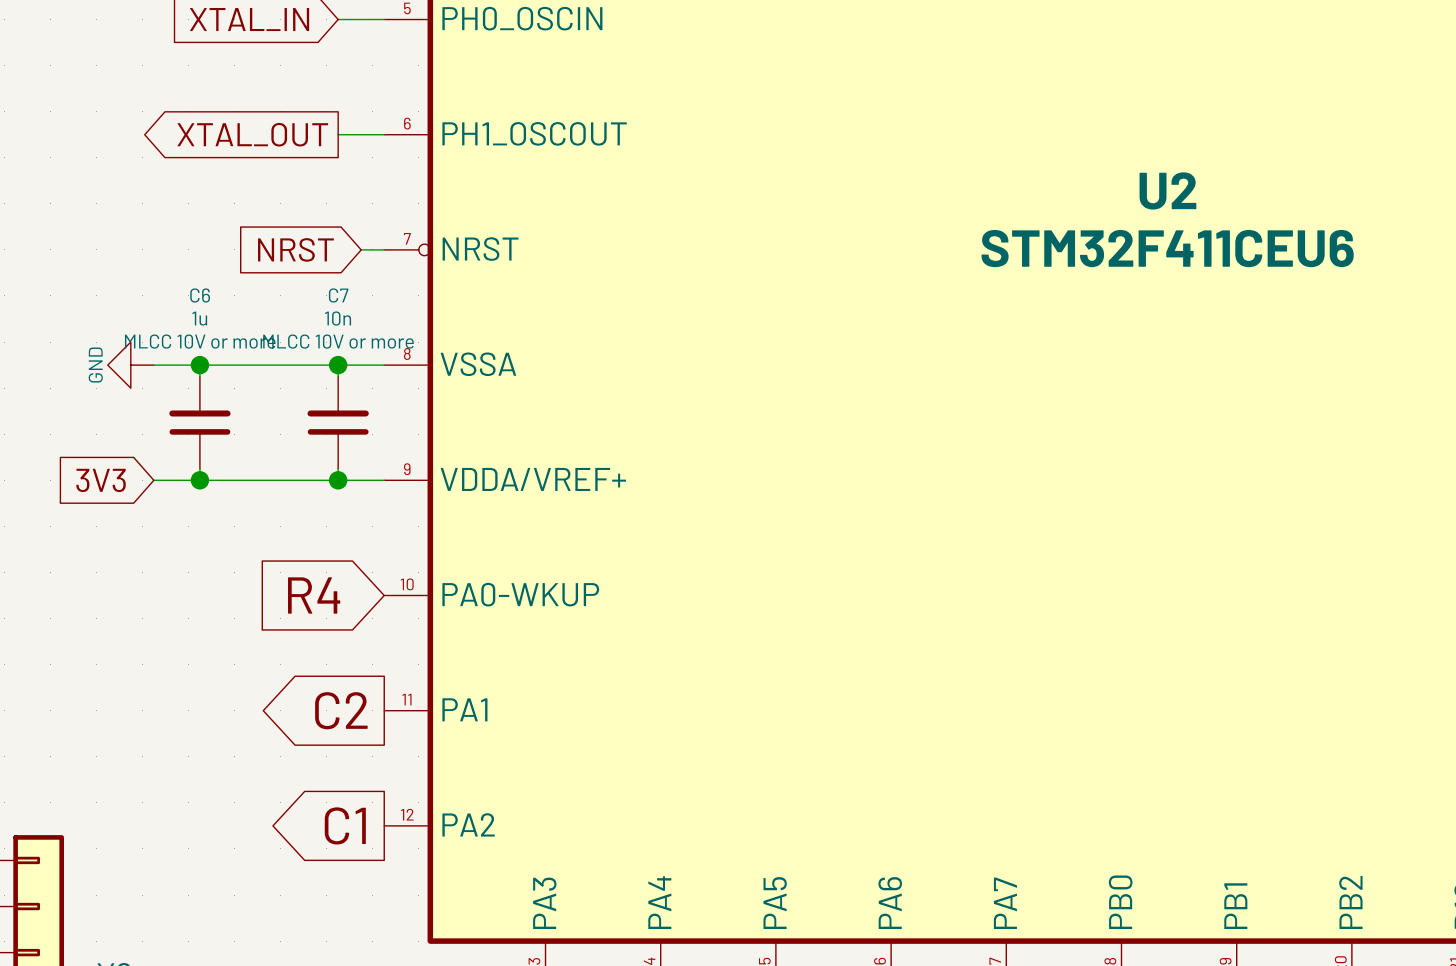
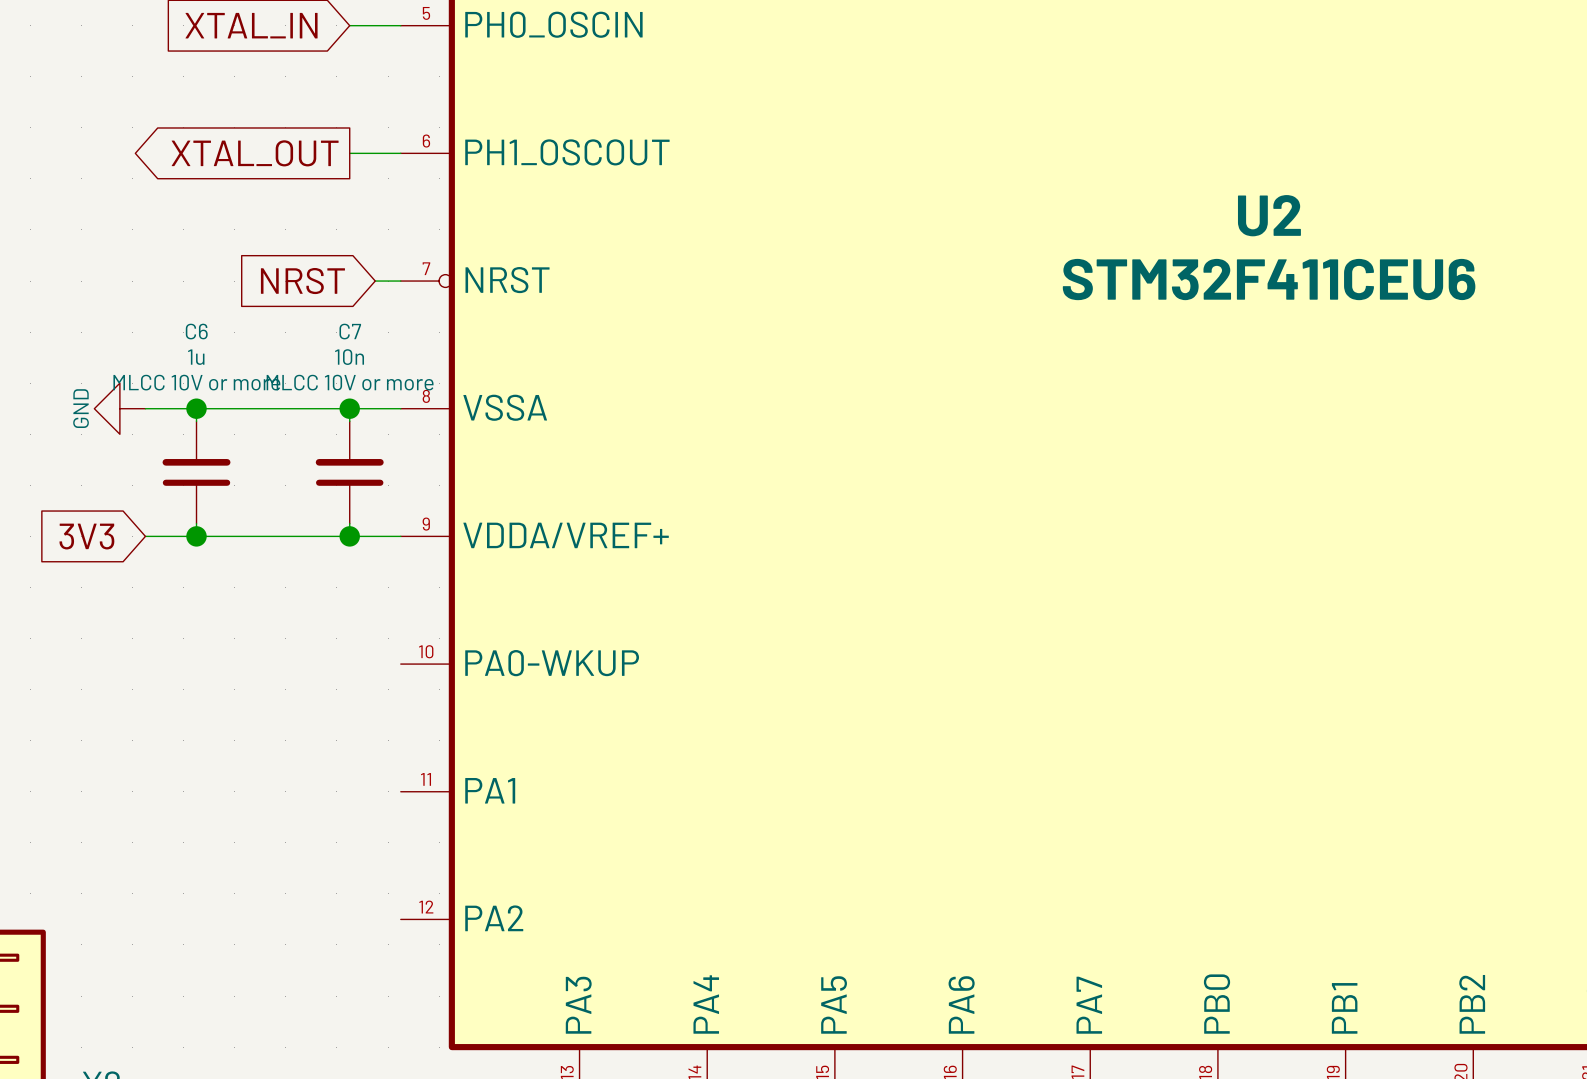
global label: R4 (314, 595) -> none
global label: C2 (341, 710) -> none
global label: C1 (345, 825) -> none

